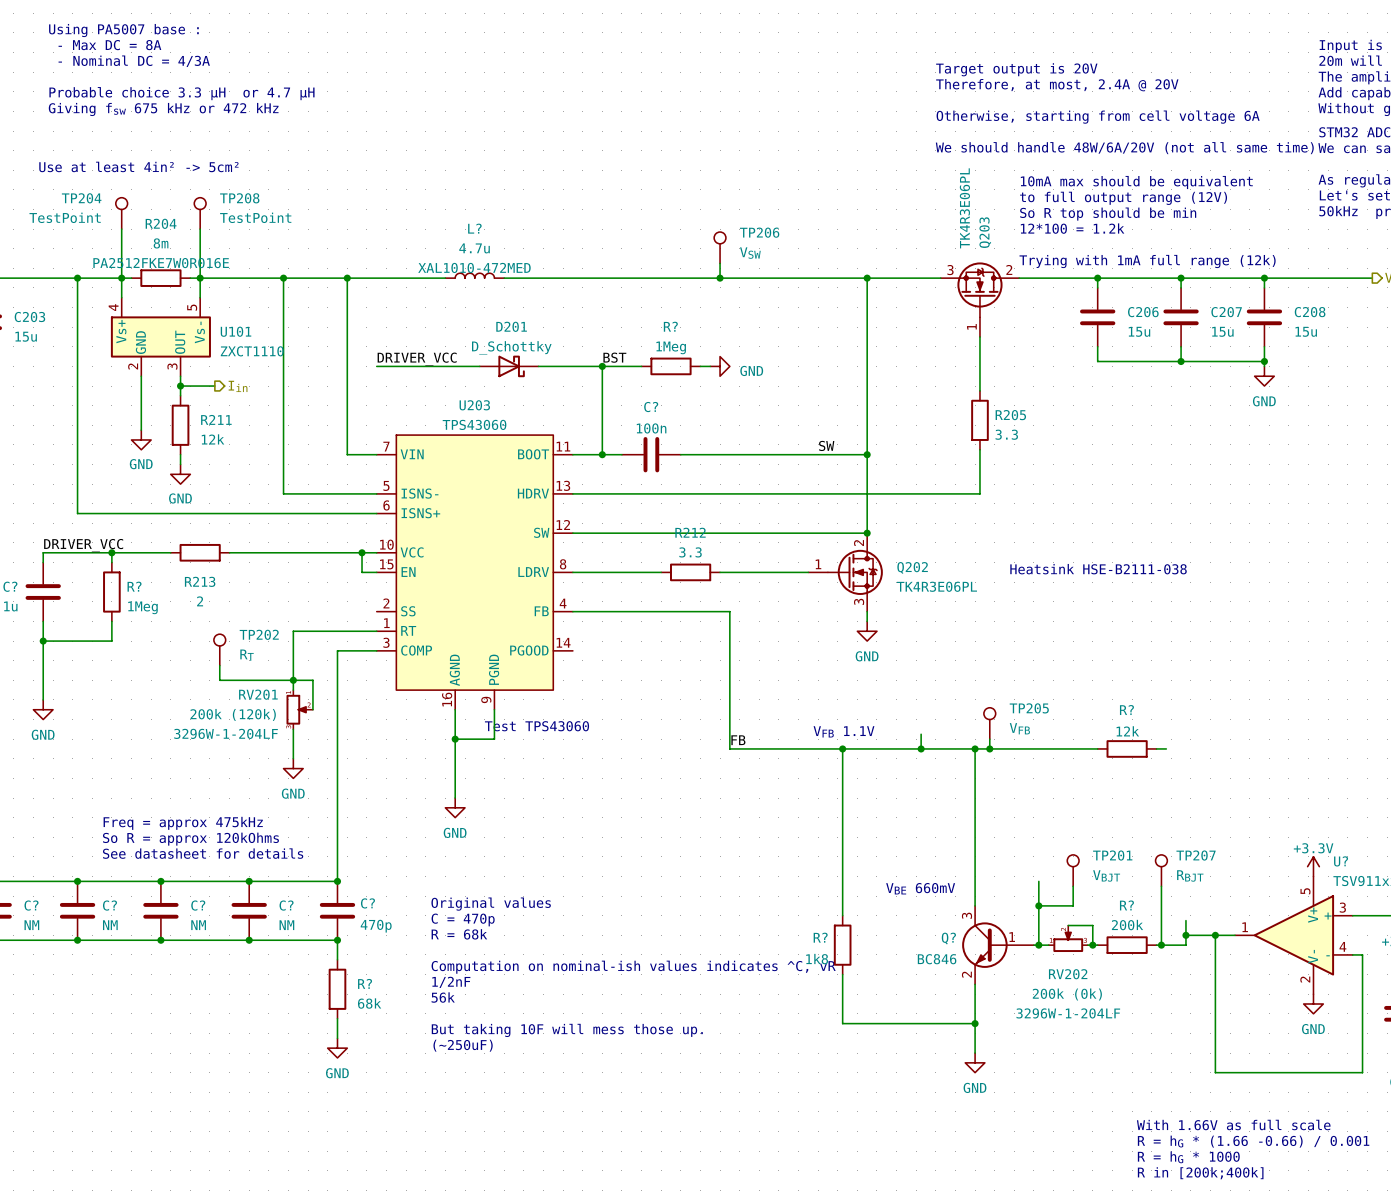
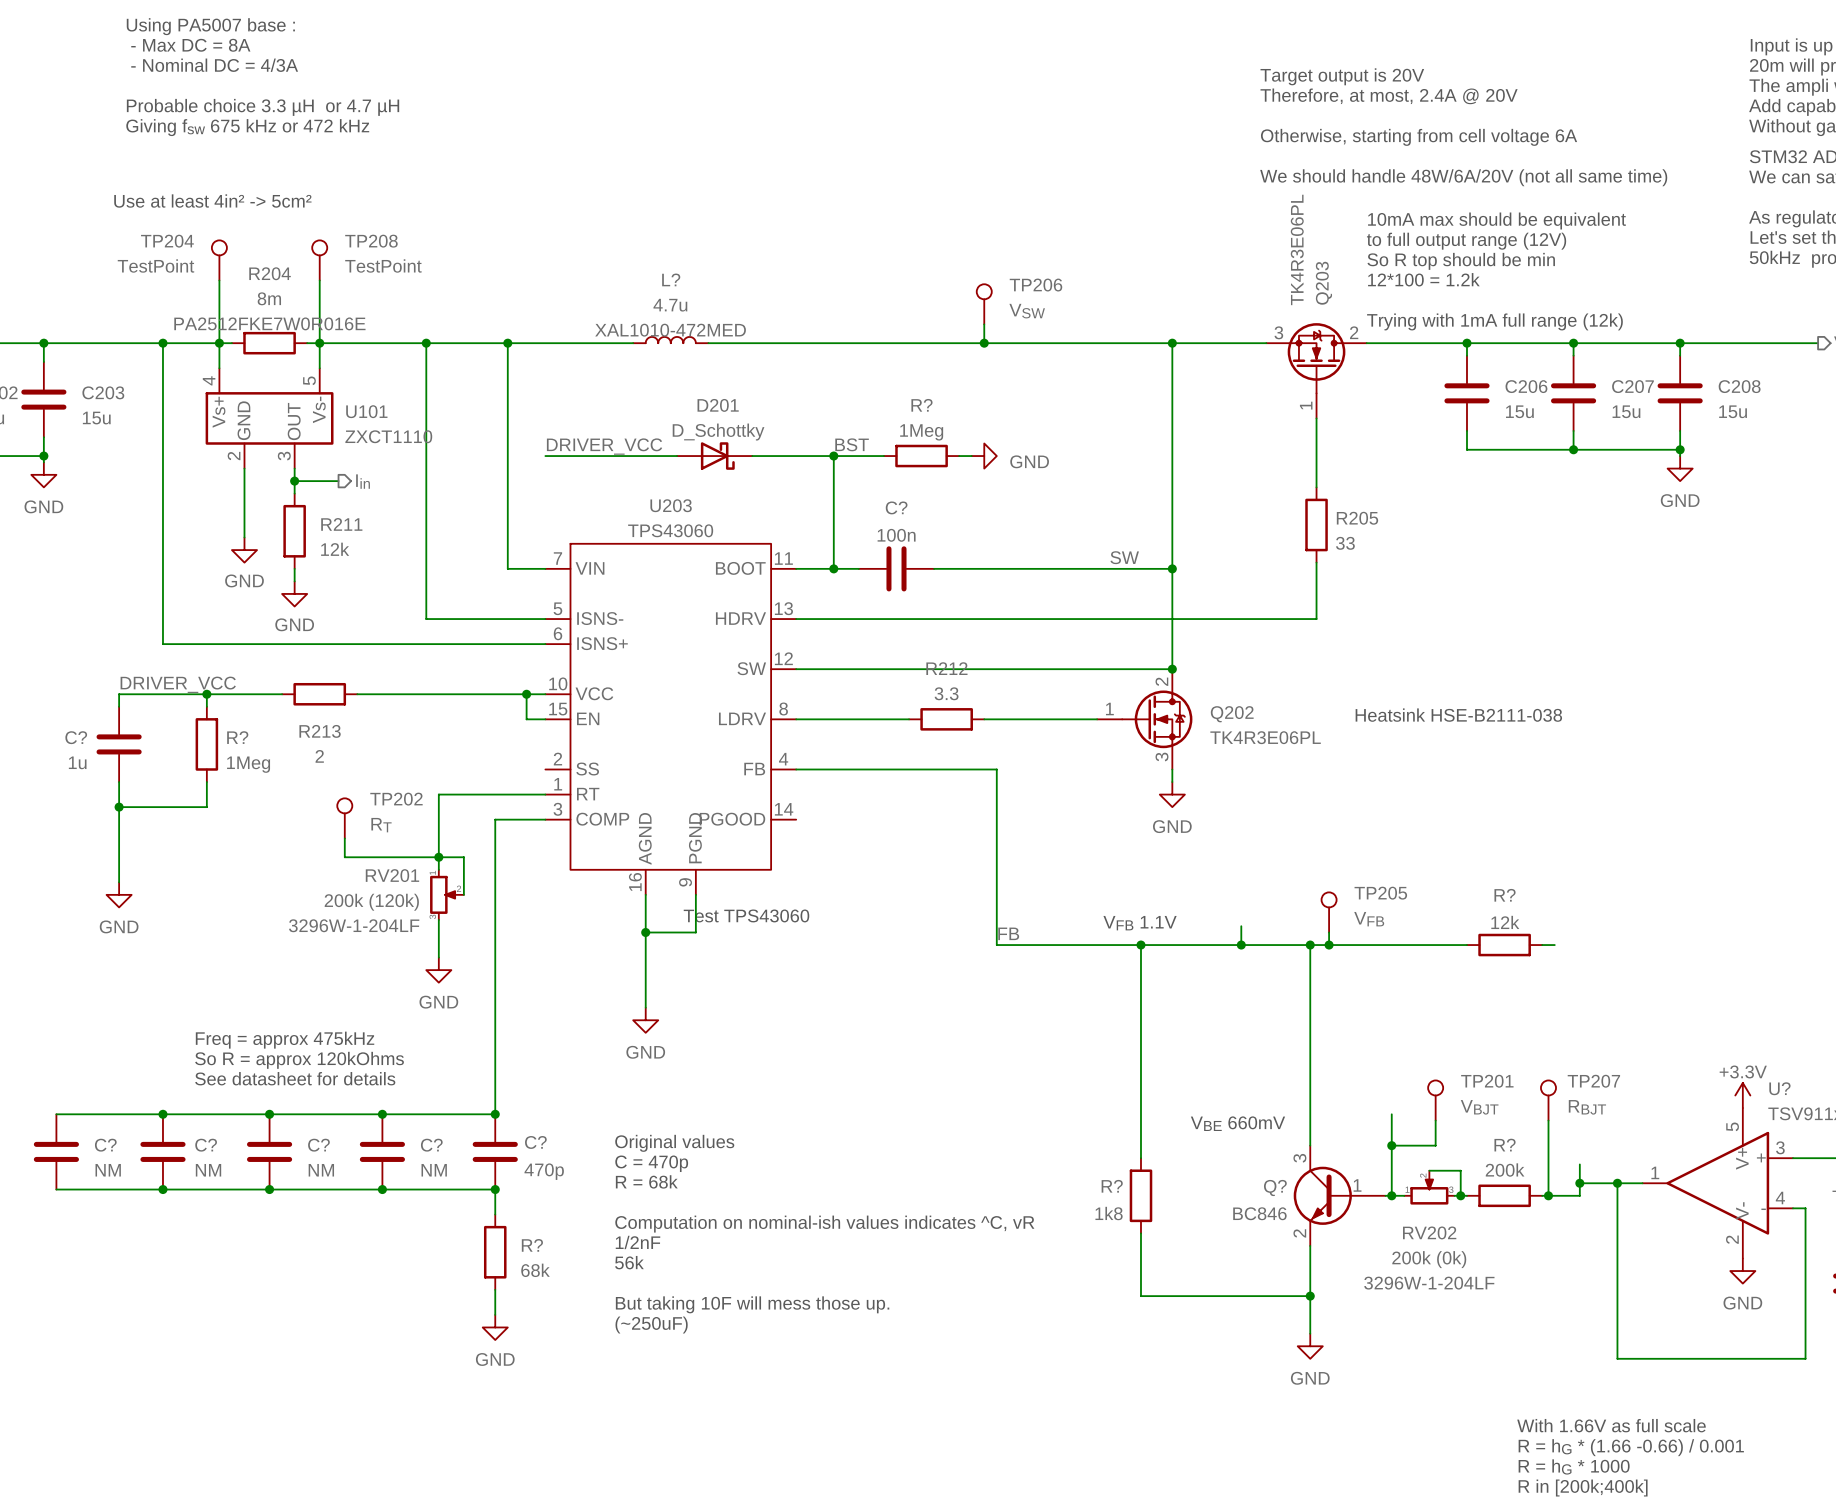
R205 value: 3.3 (1006, 434) -> 33 (1345, 543)

